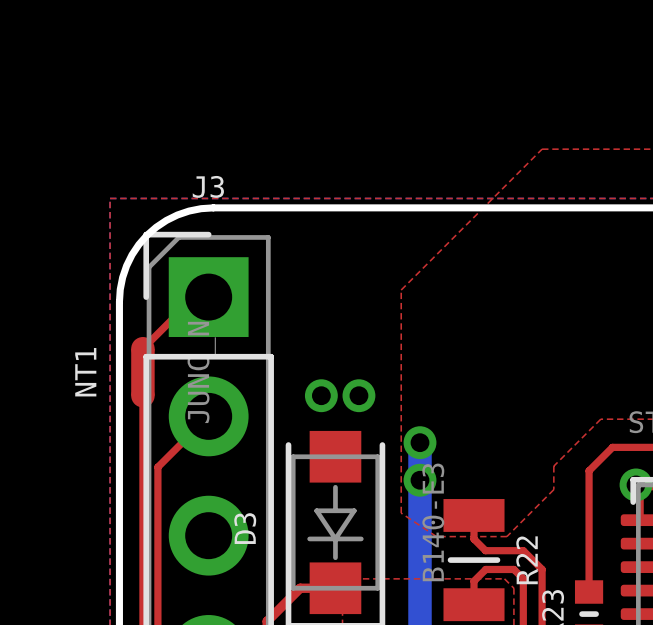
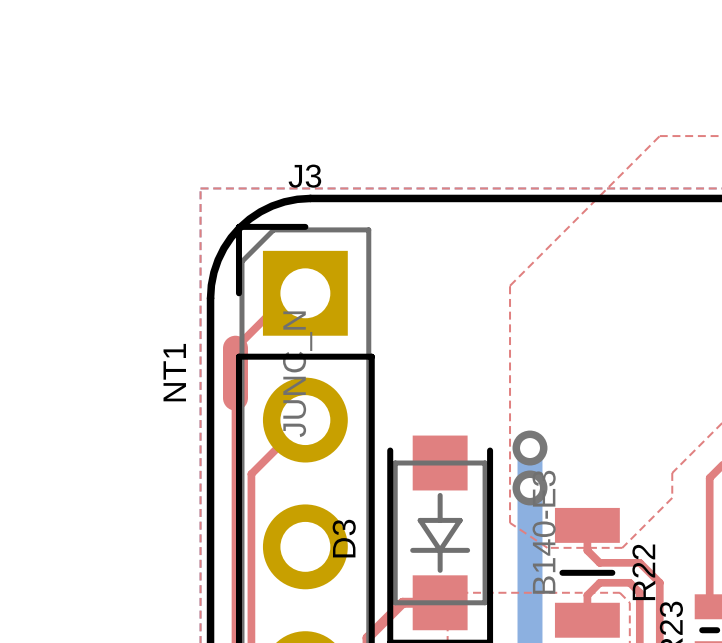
via: (321, 395) -> none
via: (358, 395) -> none

